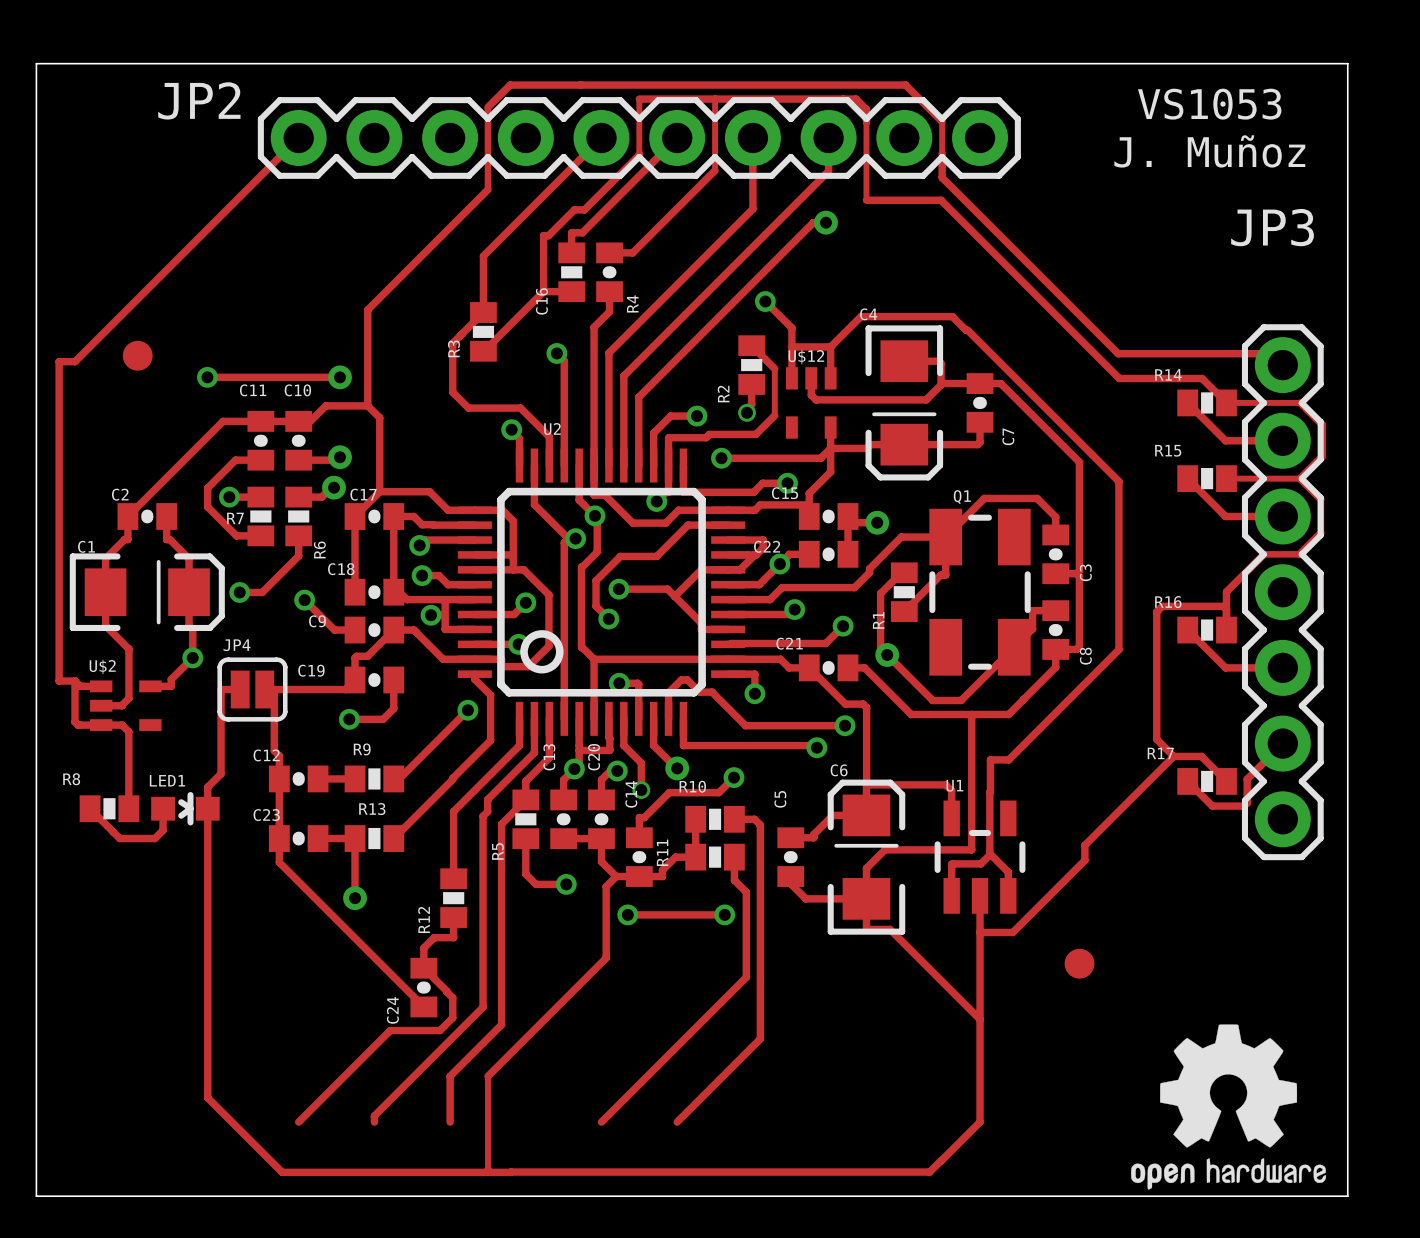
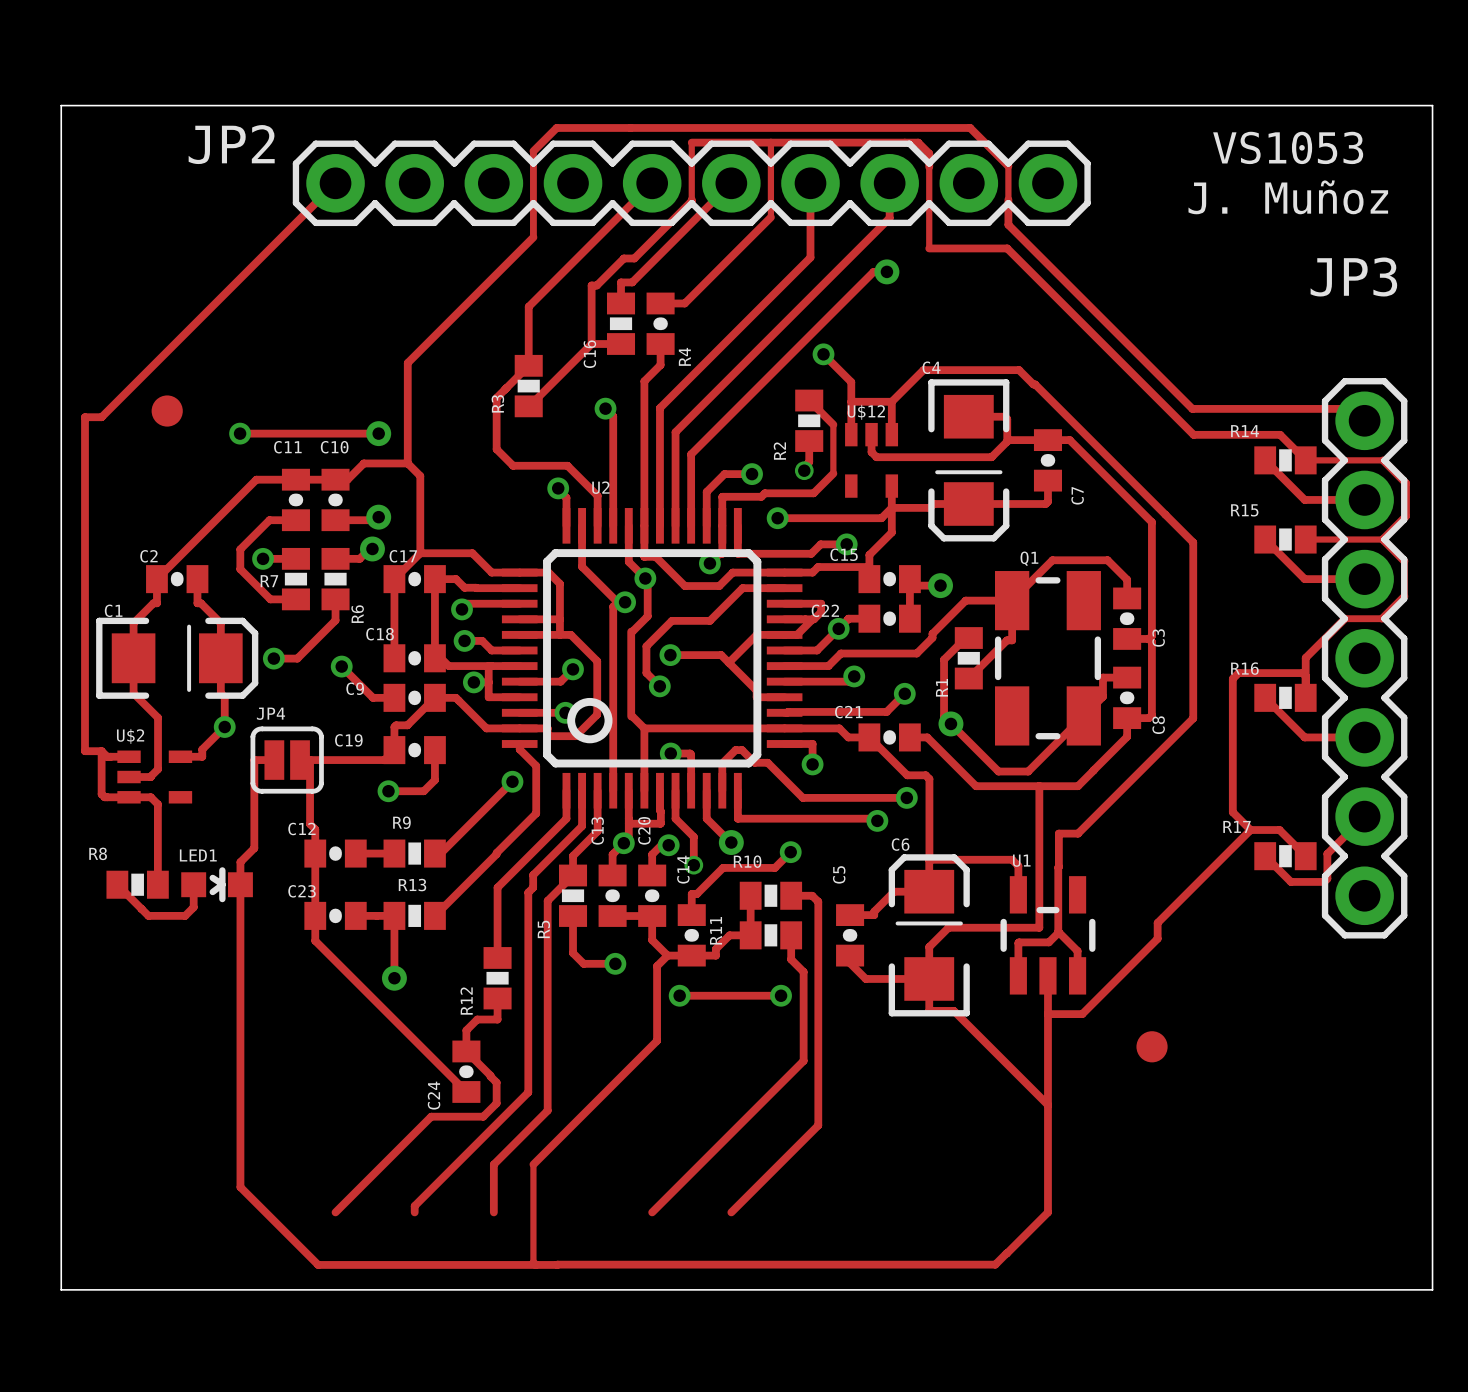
drawing: [1131, 1024, 1327, 1190] -> none

